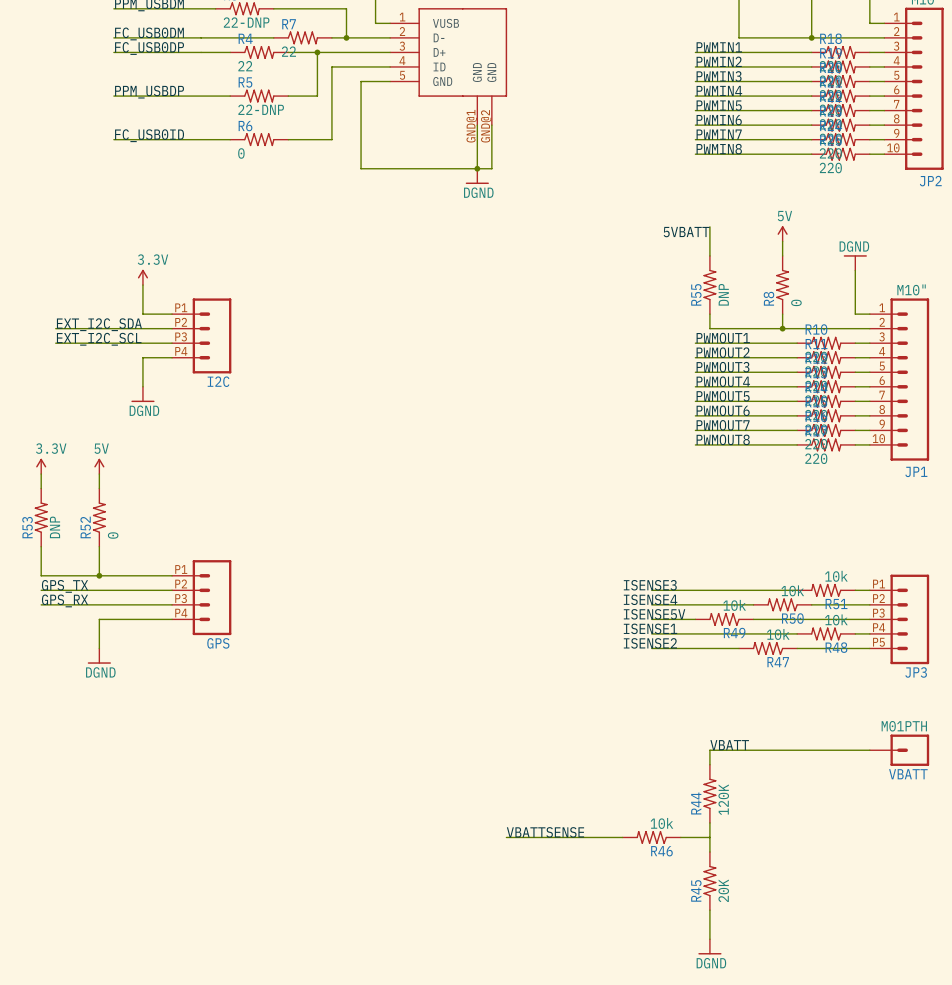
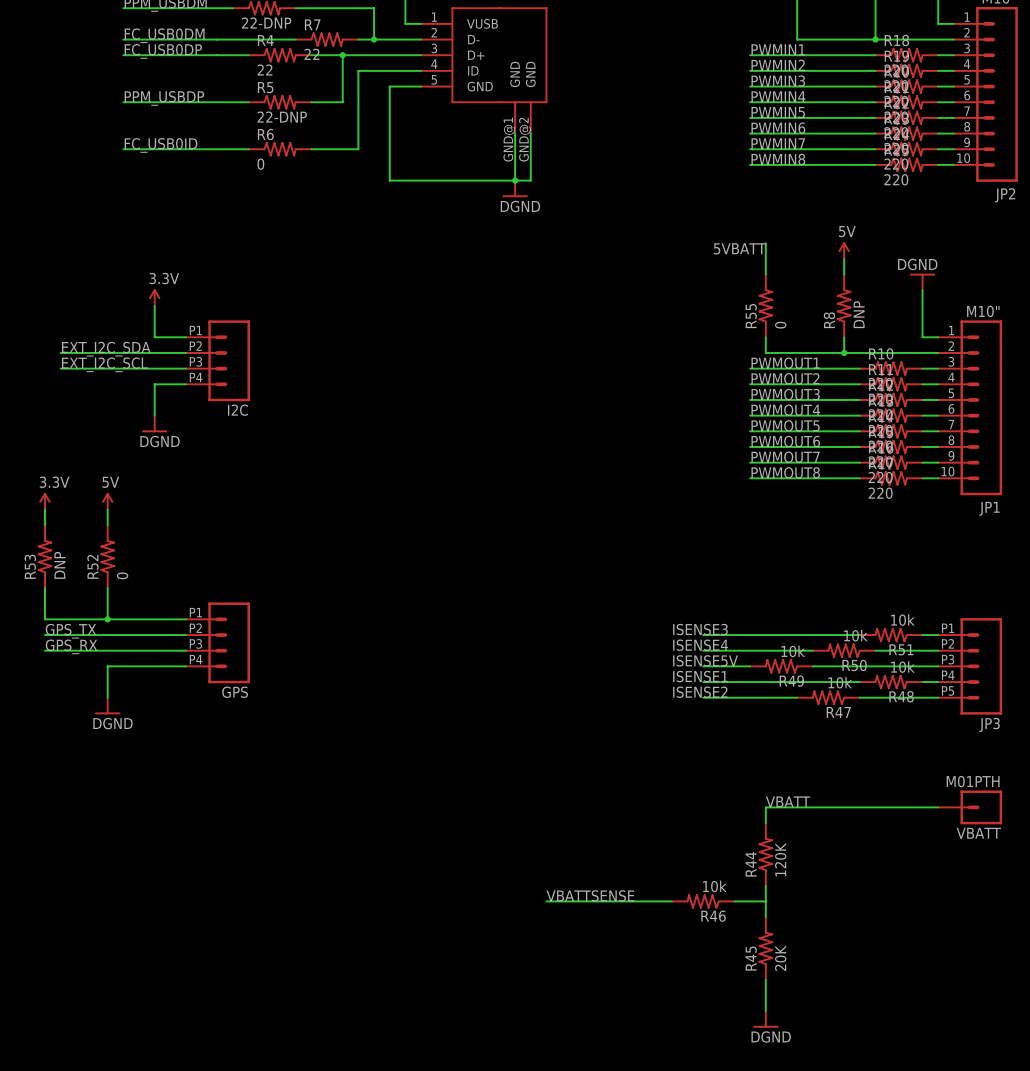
R55 value: DNP (723, 294) -> 0 (780, 325)
R8 value: 0 (796, 302) -> DNP (859, 314)

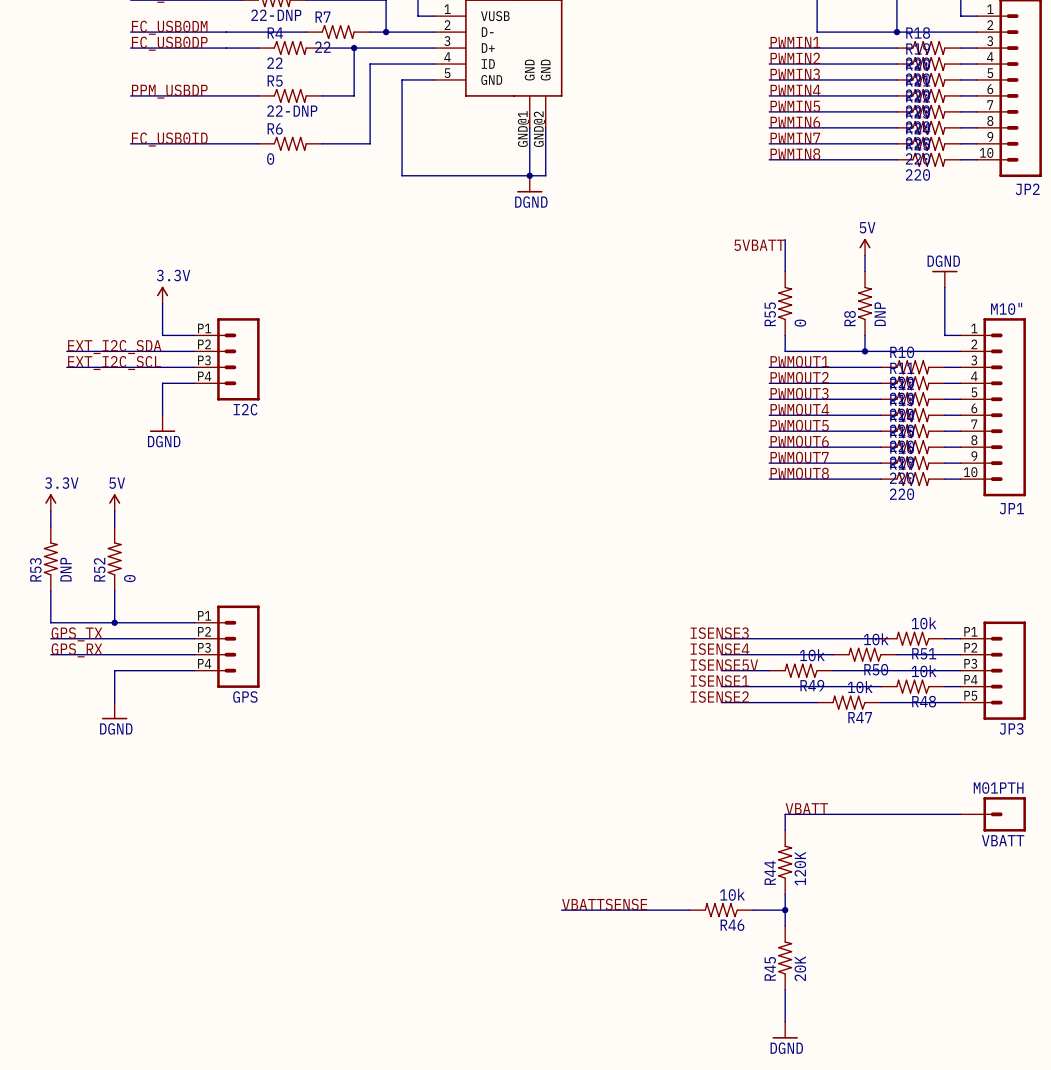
junction: none -> (785, 910)

